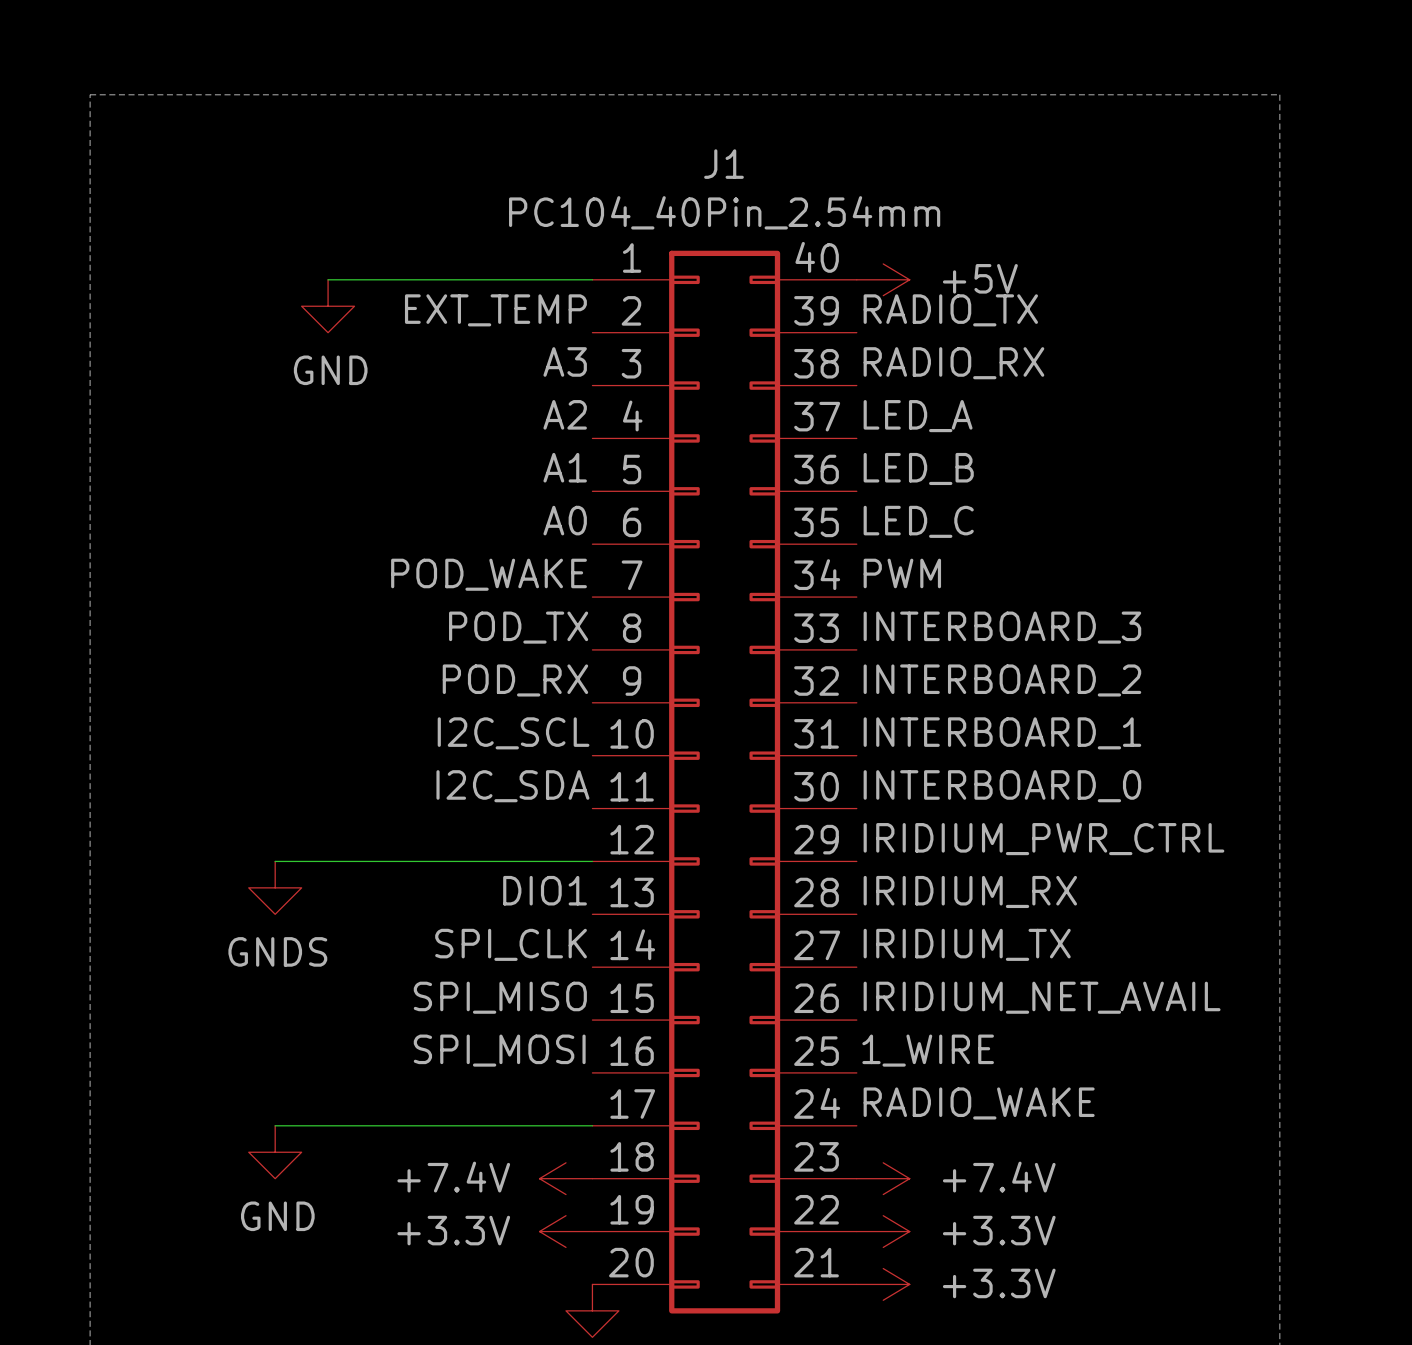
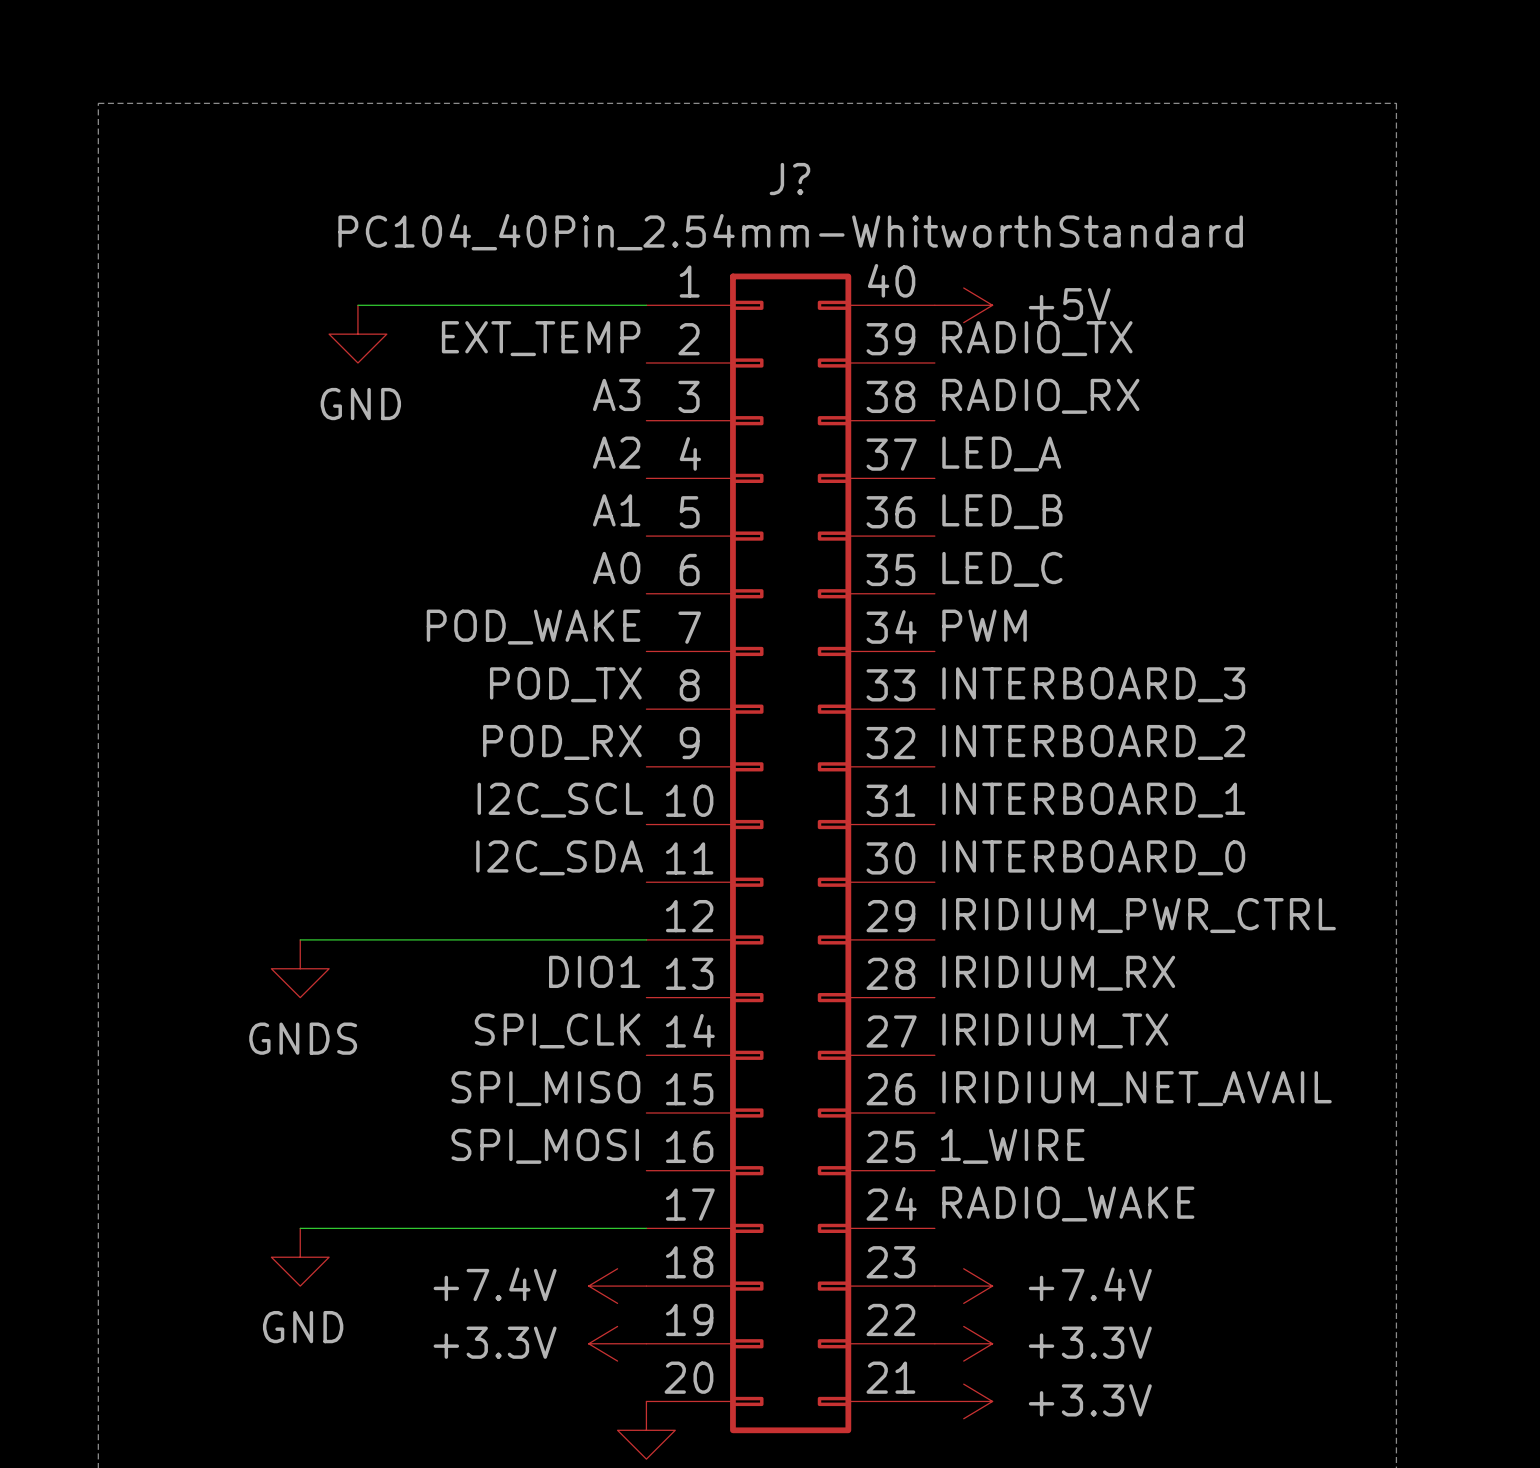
J1 name: J1 (723, 164) -> J? (789, 179)
J1 value: PC104_40Pin_2.54mm (724, 212) -> PC104_40Pin_2.54mm-WhitworthStandard (790, 232)

